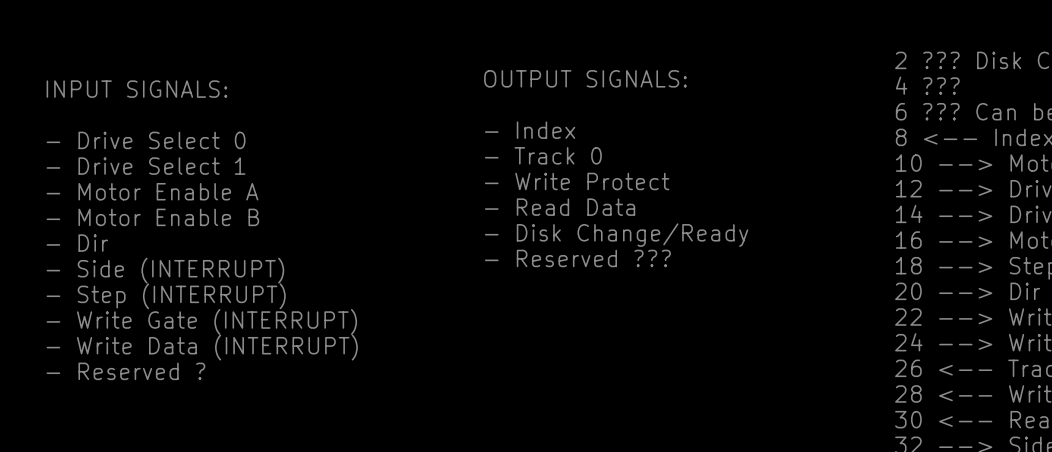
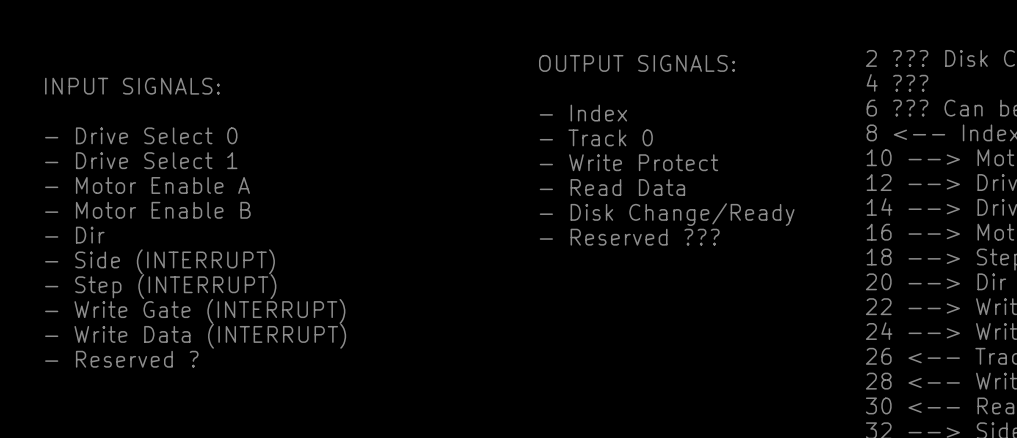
text position: OUTPUT SIGNALS: (585, 78) -> OUTPUT SIGNALS: (637, 63)
text position: - Index (530, 130) -> - Index (583, 113)
text position: - Track 0 (543, 155) -> - Track 0 (596, 137)
text position: - Write Protect (577, 181) -> - Write Protect (628, 162)
text position: - Read Data (560, 207) -> - Read Data (612, 187)
text position: - Disk Change/Ready (616, 235) -> - Disk Change/Ready (667, 214)
text position: - Reserved ??? (577, 258) -> - Reserved ??? (629, 237)

